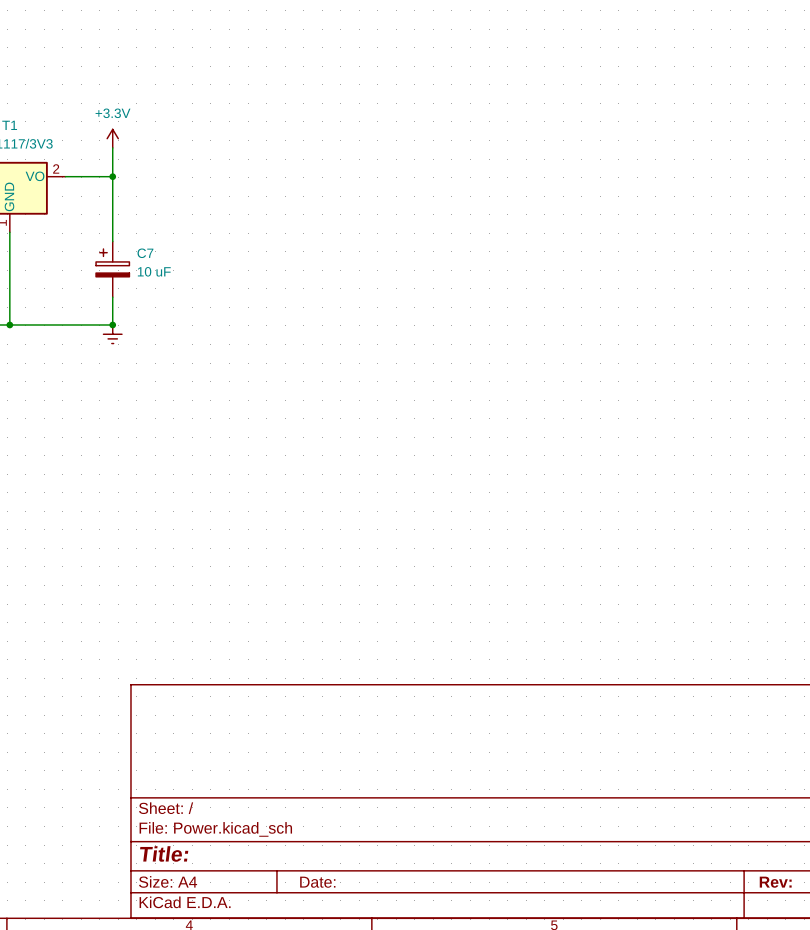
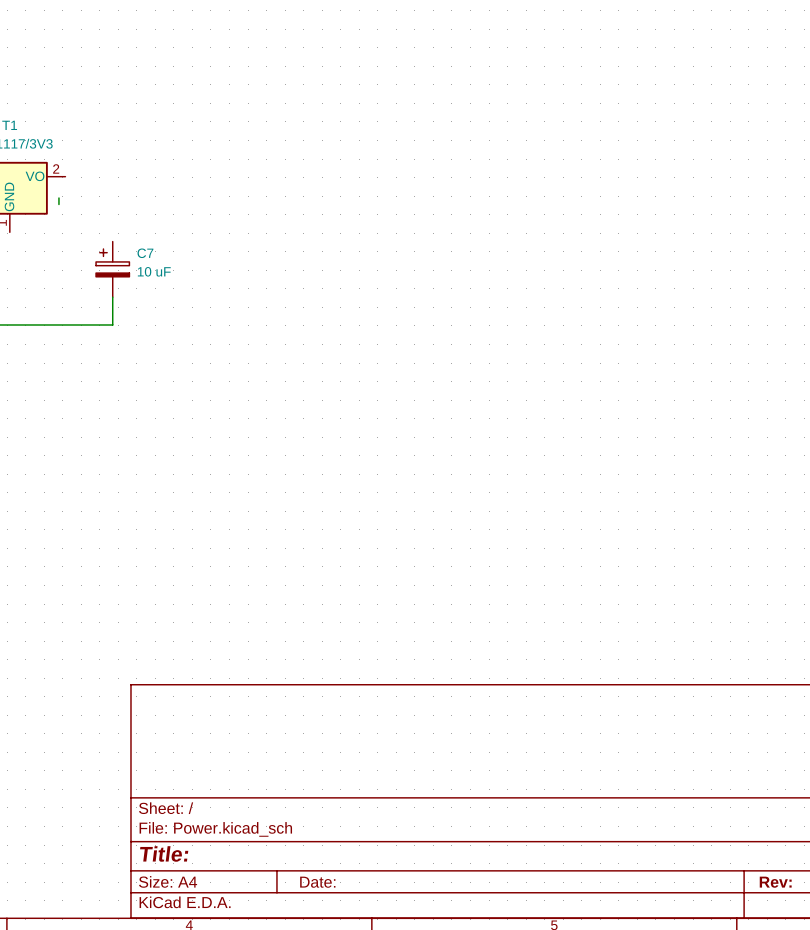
power symbol: +3.3V (112, 138) -> none
wire: (112, 147) (112, 241) -> none
wire: (65, 176) (112, 176) -> none
junction: (112, 176) -> none
wire: none -> (58, 198) (58, 204)
wire: (9, 232) (9, 324) -> none
junction: (9, 324) -> none
junction: (112, 324) -> none
power symbol: (112, 334) -> none

